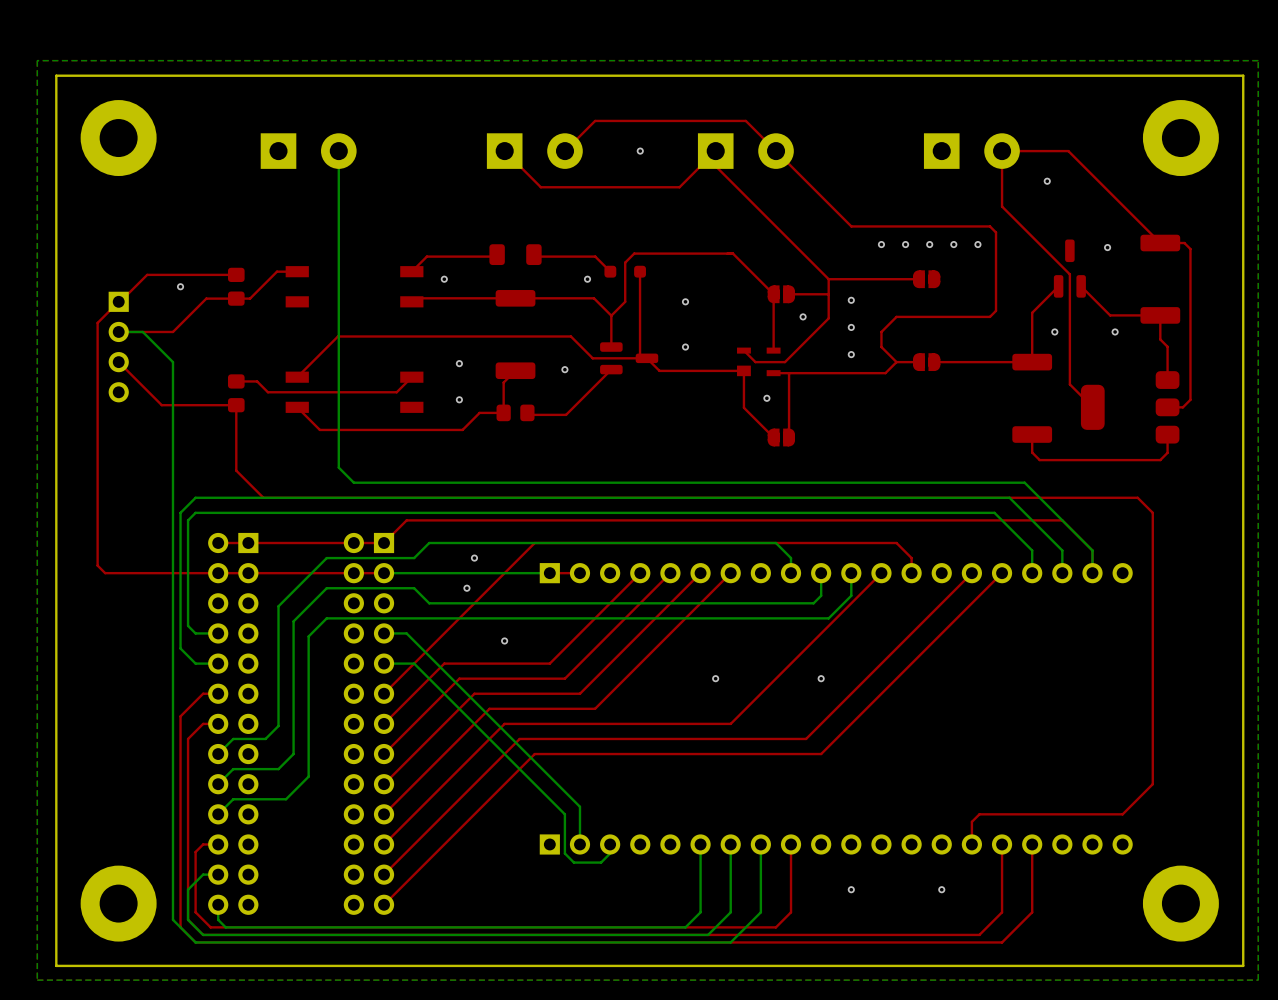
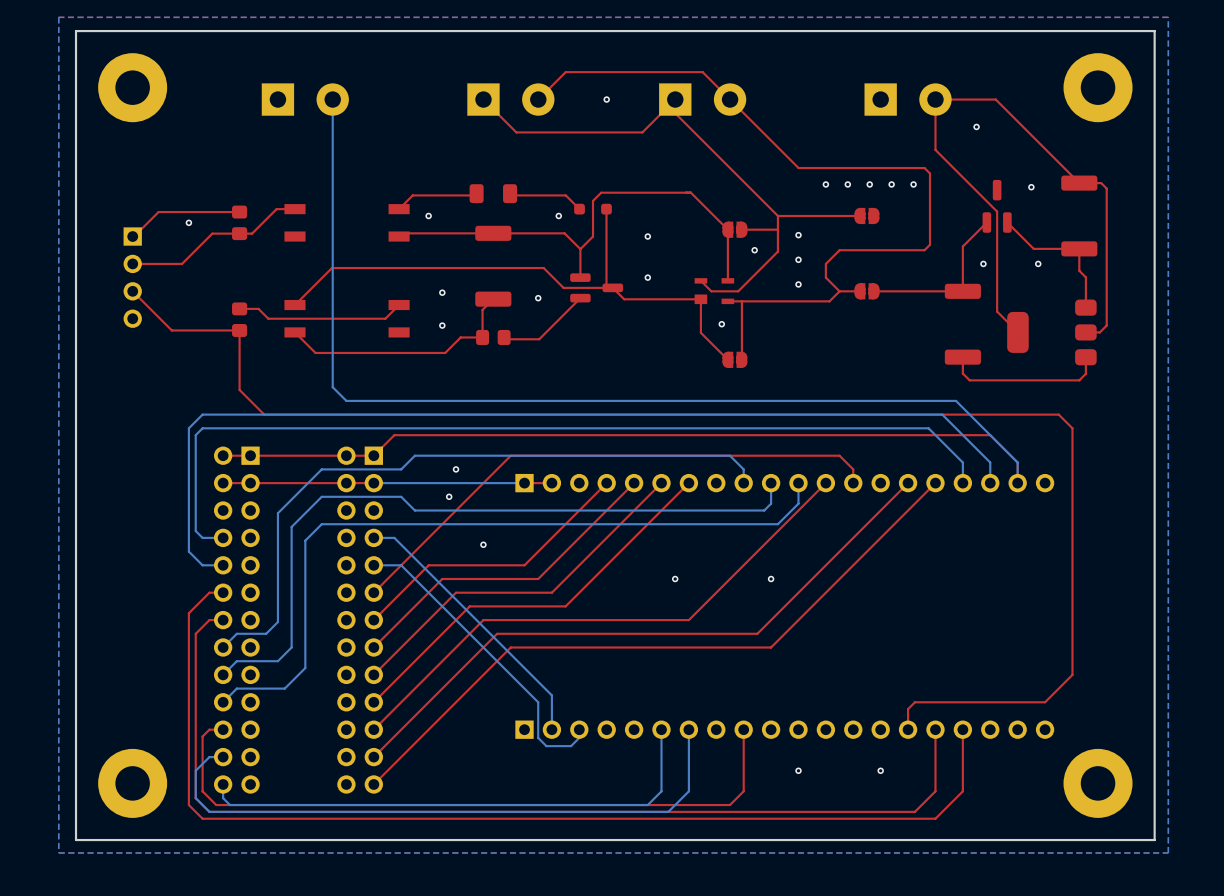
top track: (118, 301) (97, 322) (97, 565) (105, 573) (218, 573) -> none
bottom track: (118, 331) (142, 331) (172, 362) (172, 919) (195, 942) (730, 942) (760, 912) (760, 844) -> none

